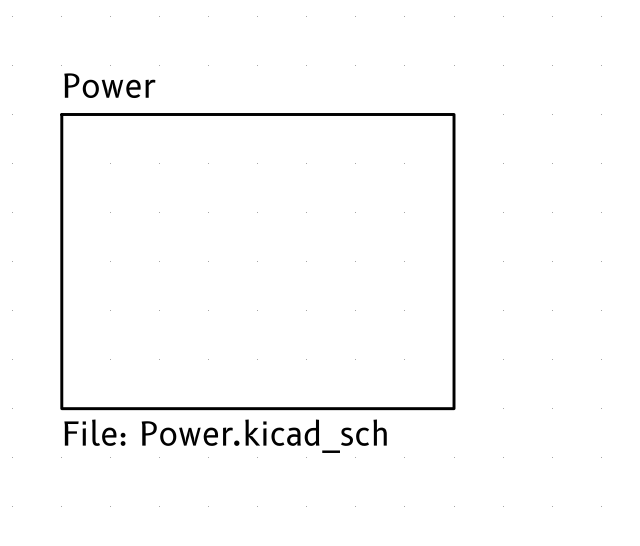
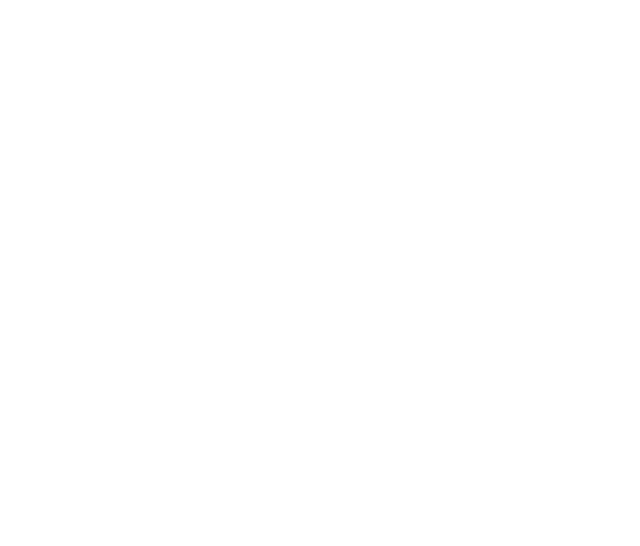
sheet Power: File: Power.kicad_sch (257, 261) -> none

